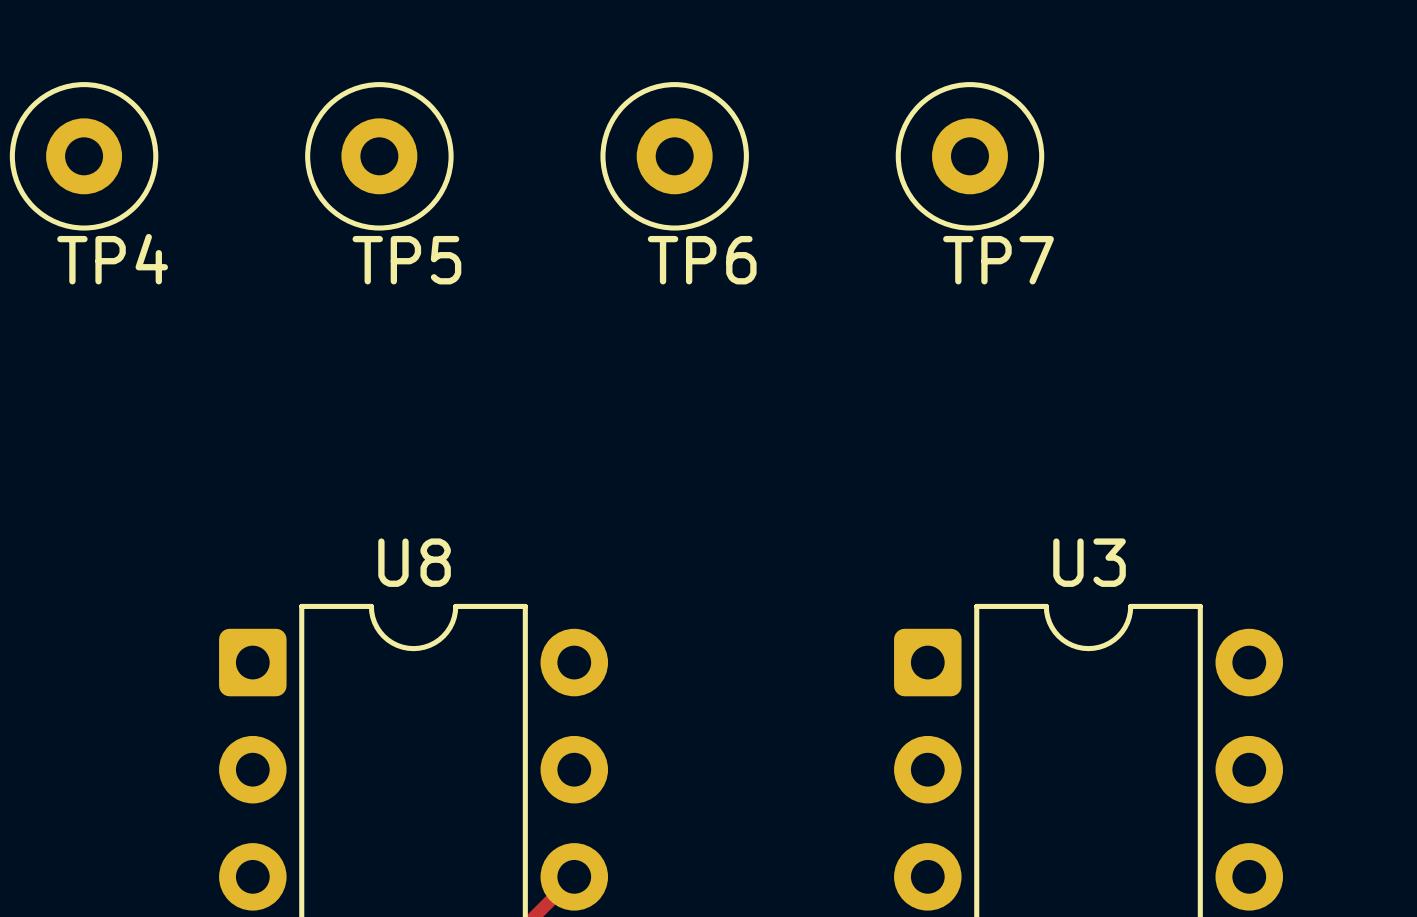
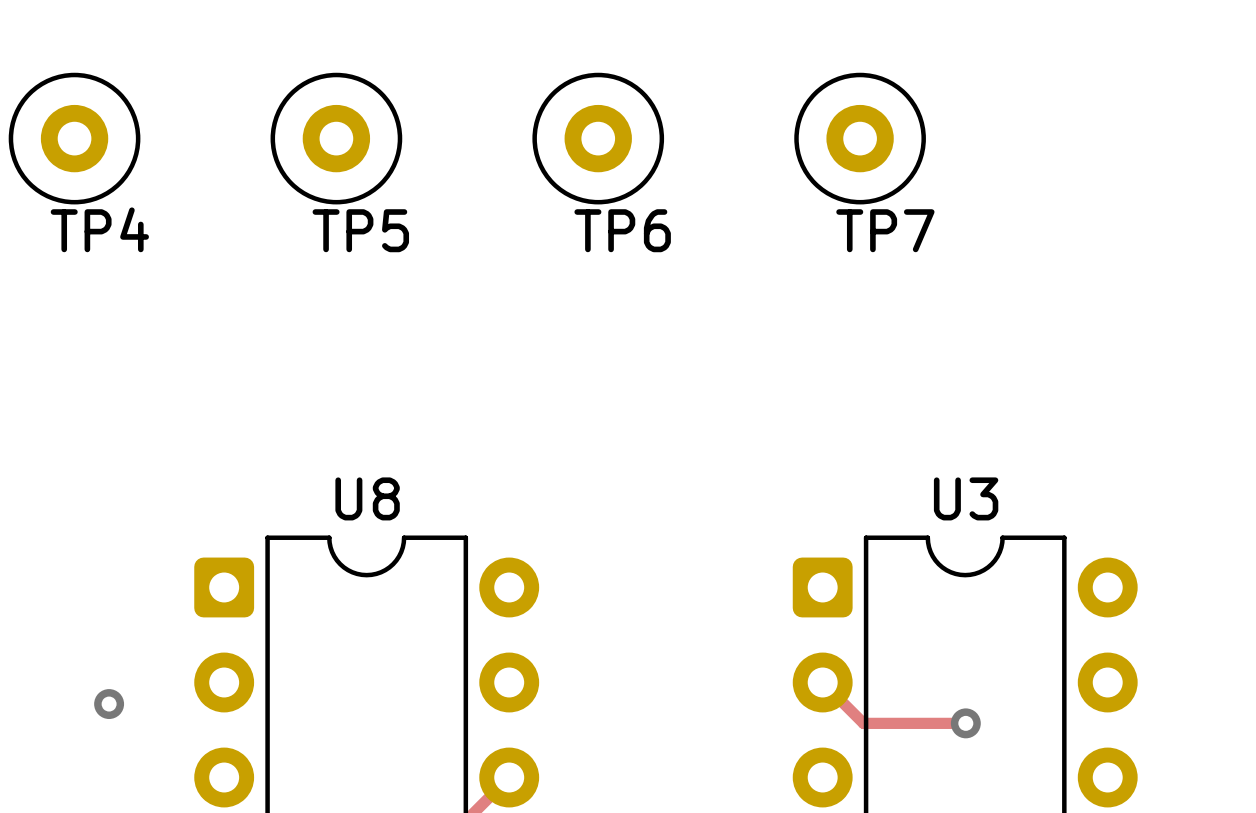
track: none -> (822, 682) (863, 723) (965, 723)
via: none -> (109, 704)
via: none -> (965, 723)

